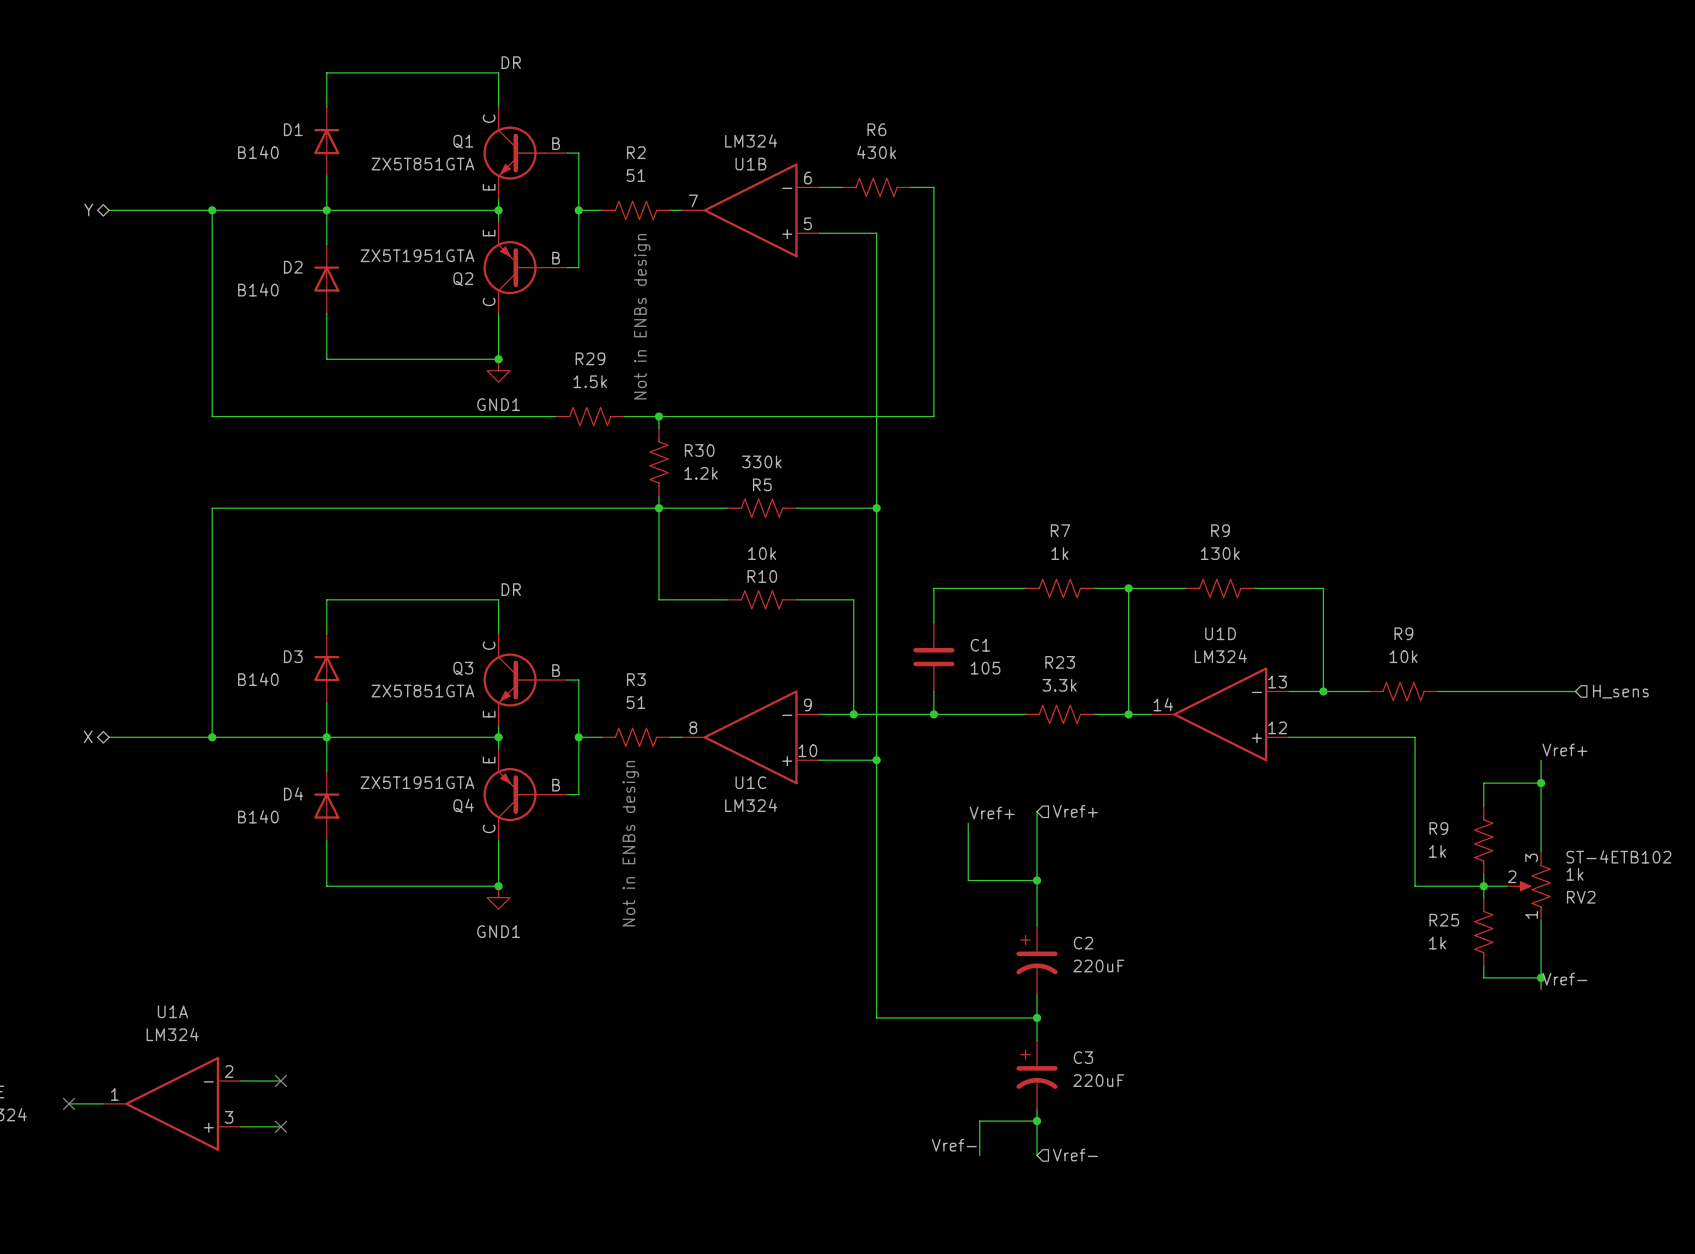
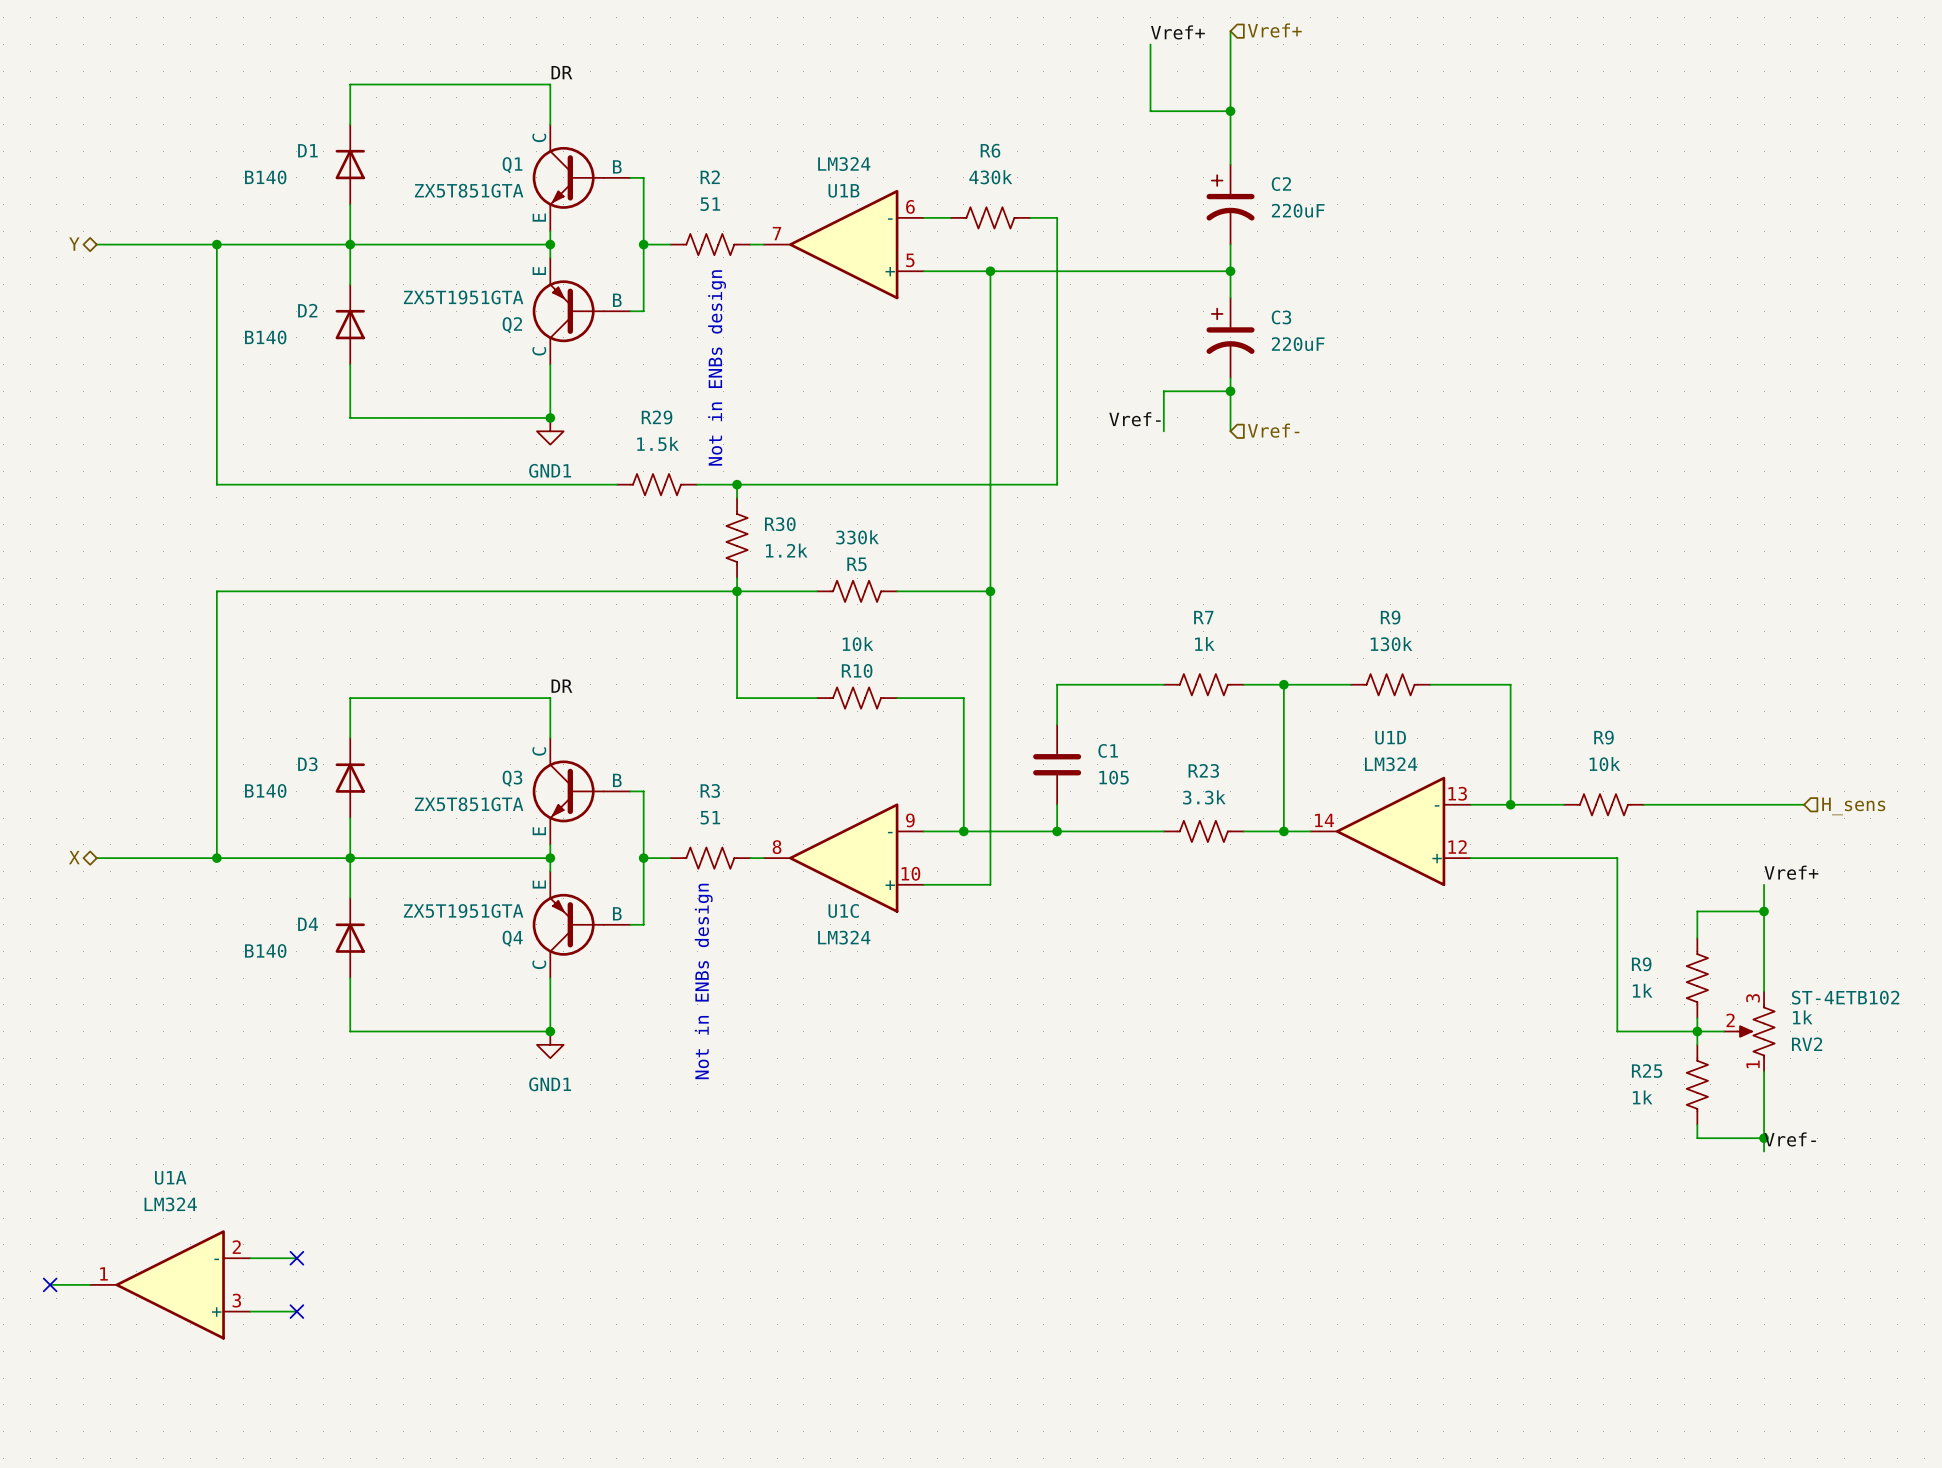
hierarchical label: none -> Vref+ (1274, 30)
wire: none -> (1230, 31) (1230, 164)
label: none -> Vref+ (1177, 32)
wire: none -> (1150, 44) (1150, 111) (1230, 111)
junction: none -> (1230, 111)
wire: none -> (1230, 244) (1230, 297)
wire: none -> (990, 271) (1230, 271)
junction: none -> (990, 271)
junction: none -> (1230, 271)
wire: none -> (1230, 377) (1230, 431)
wire: none -> (1230, 391) (1163, 391) (1163, 431)
junction: none -> (1230, 391)
label: none -> Vref- (1134, 419)
hierarchical label: none -> Vref- (1273, 430)
wire: (876, 760) (876, 1017) (1037, 1017) -> none
junction: (876, 760) -> none
wire: (1037, 811) (1037, 926) -> none
hierarchical label: Vref+ (1075, 811) -> none
label: Vref+ (992, 813) -> none
wire: (968, 823) (968, 880) (1037, 880) -> none
junction: (1037, 880) -> none
C2 position: (1037, 960) -> (1230, 204)
wire: (1037, 995) (1037, 1040) -> none
junction: (1037, 1017) -> none
C3 position: (1037, 1075) -> (1230, 337)
wire: (1037, 1109) (1037, 1155) -> none
wire: (1037, 1121) (979, 1121) (979, 1155) -> none
junction: (1037, 1121) -> none
label: Vref- (954, 1145) -> none
hierarchical label: Vref- (1075, 1155) -> none

